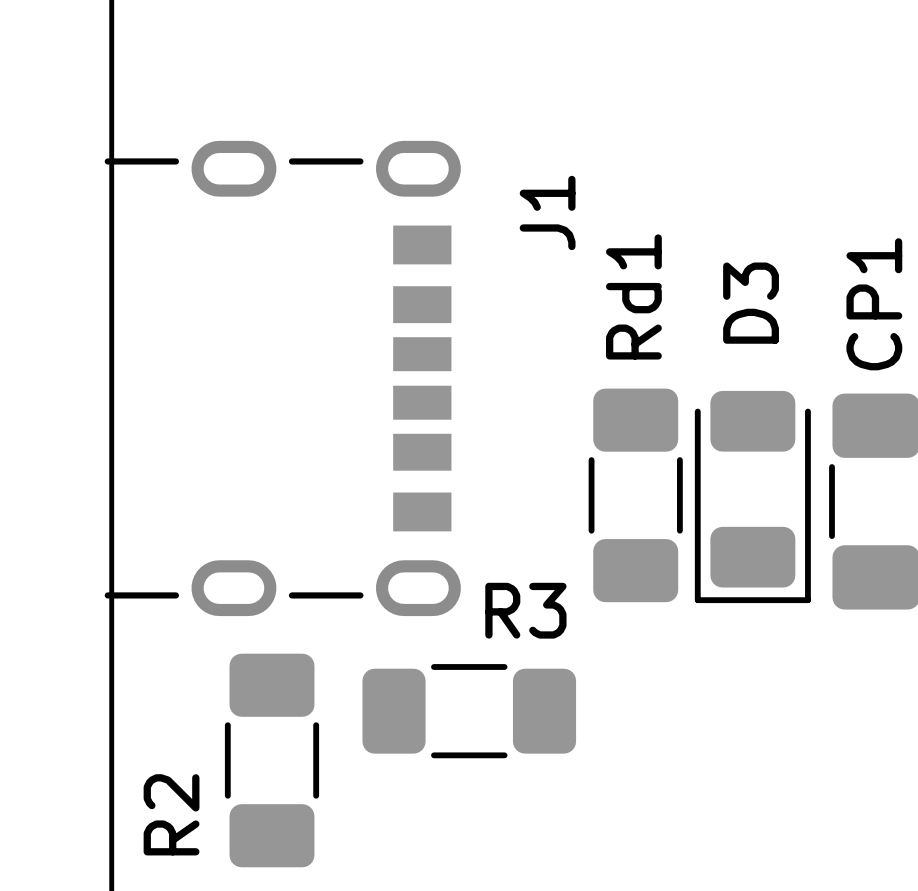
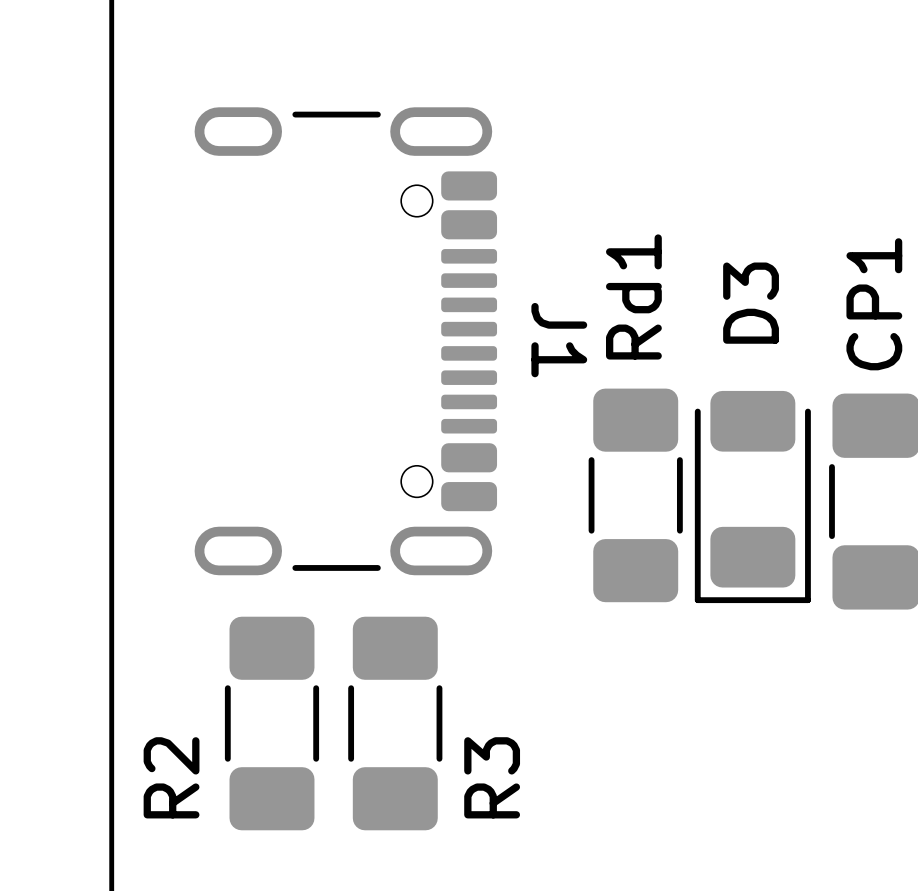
J1 footprint: [104, 140, 461, 617] -> [194, 107, 498, 576]
J1 name position: J1 (547, 212) -> J1 (559, 340)
R3 rotation: 0° (469, 711) -> 90° clockwise (395, 723)
R2 position: (271, 760) -> (271, 723)

